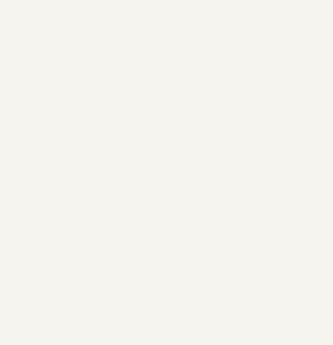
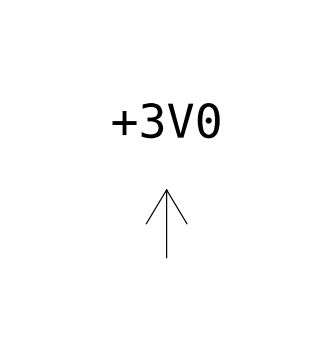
power symbol: none -> +3V0 (166, 223)

